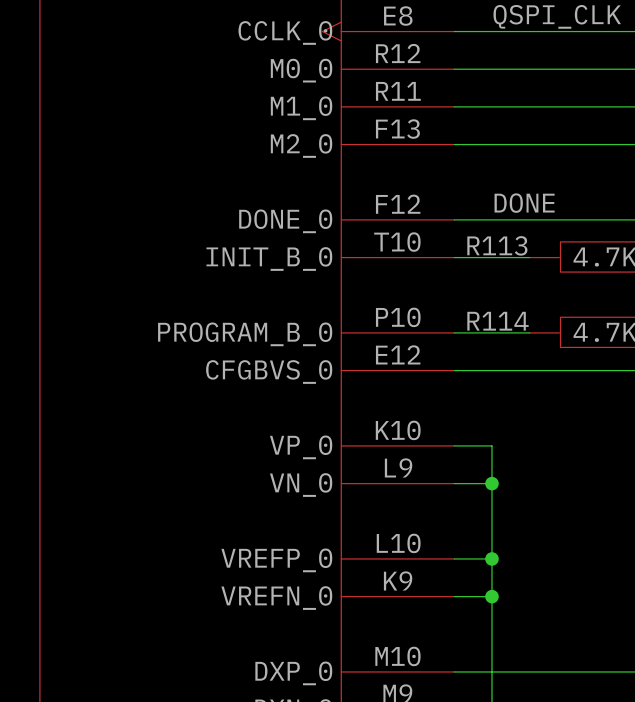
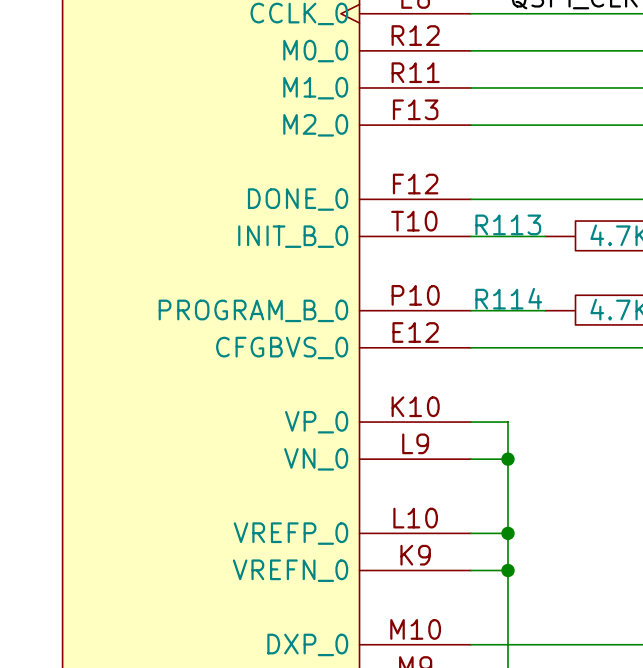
label: DONE (524, 203) -> none

